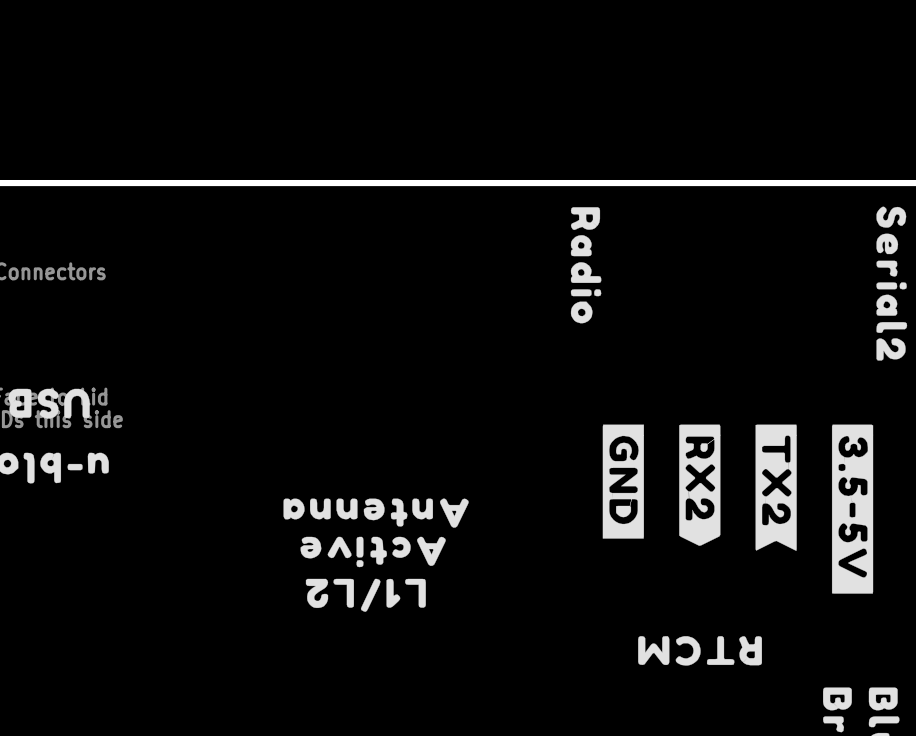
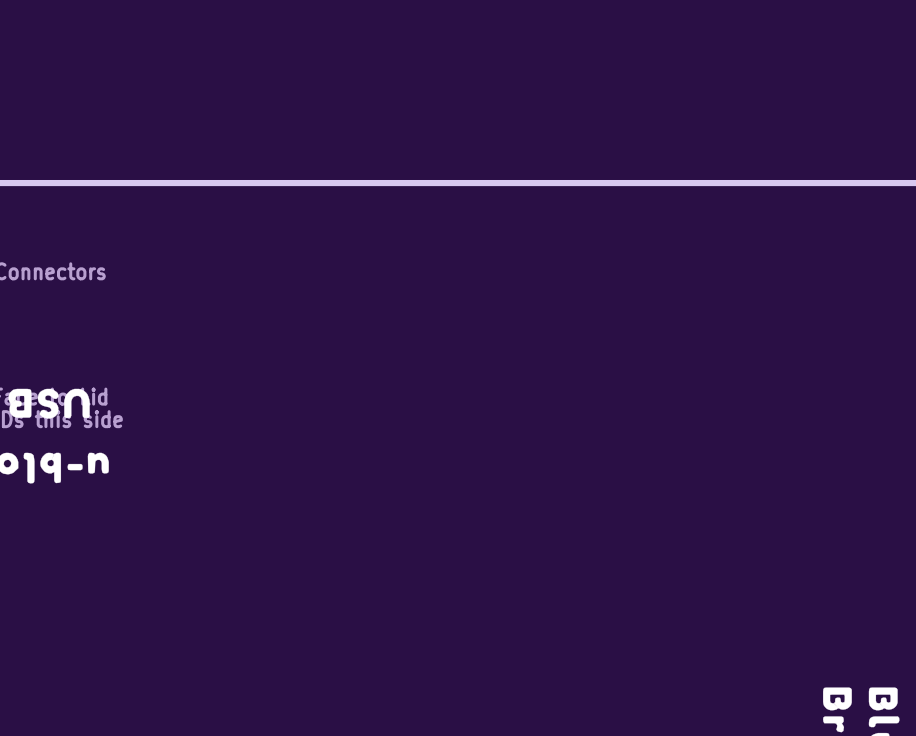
drawing: [876, 206, 908, 361] -> none
drawing: [570, 207, 602, 324] -> none
drawing: [602, 424, 874, 594] -> none
drawing: [283, 498, 469, 612] -> none
drawing: [638, 636, 763, 666] -> none

